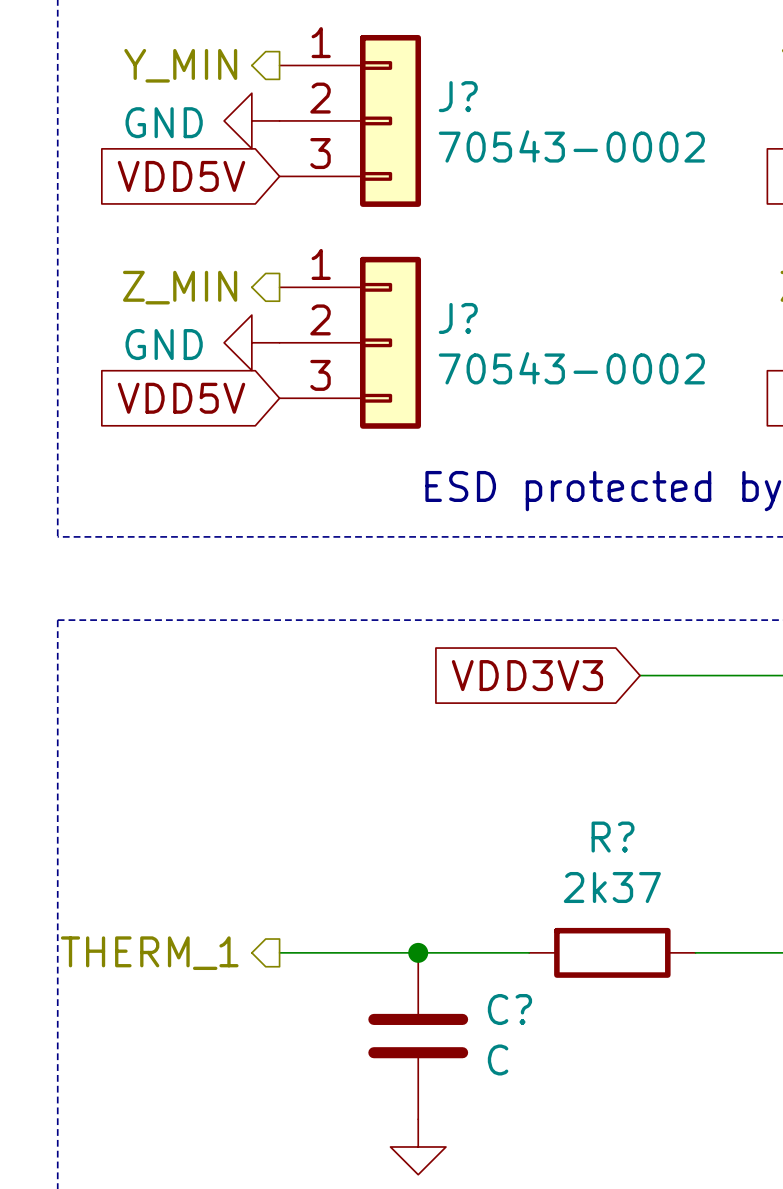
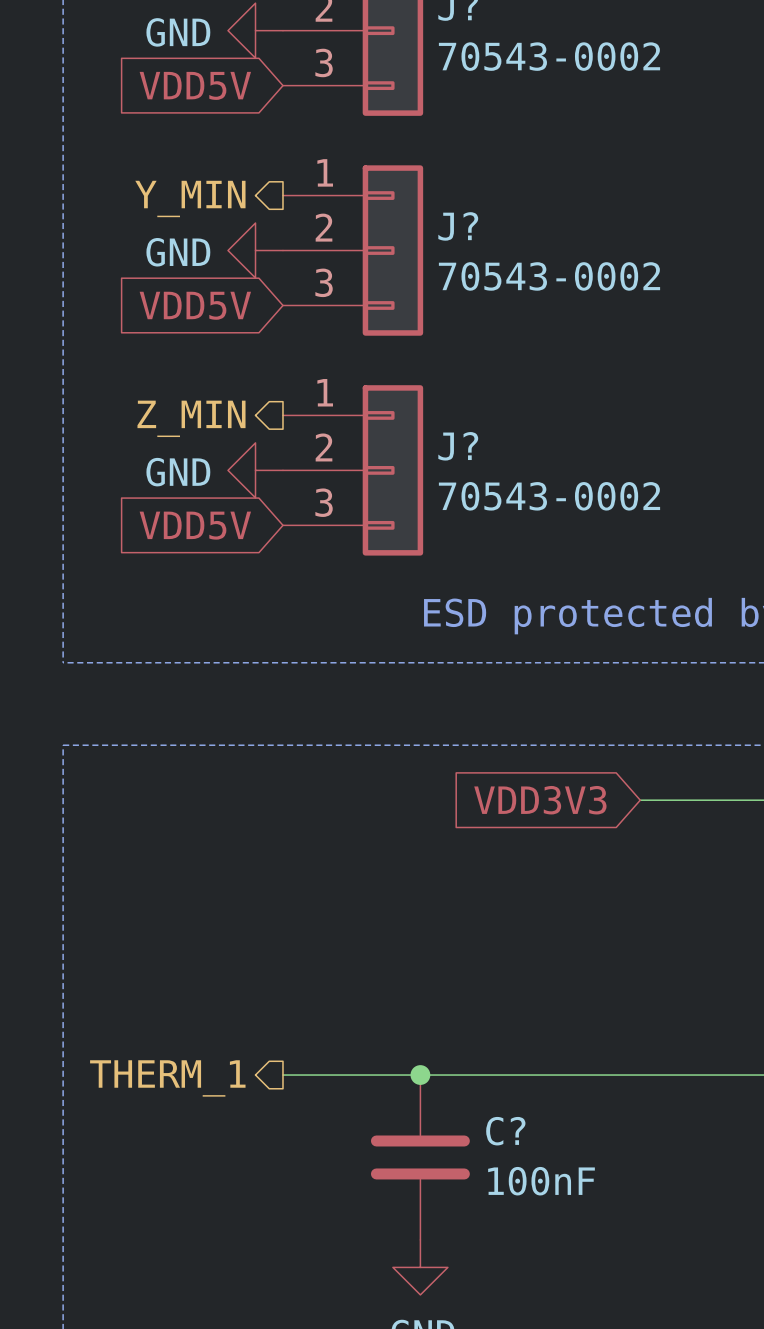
wire: none -> (530, 1075) (695, 1075)
R?: 2k37 (612, 952) -> none
C? value: C (498, 1059) -> 100nF (541, 1181)

